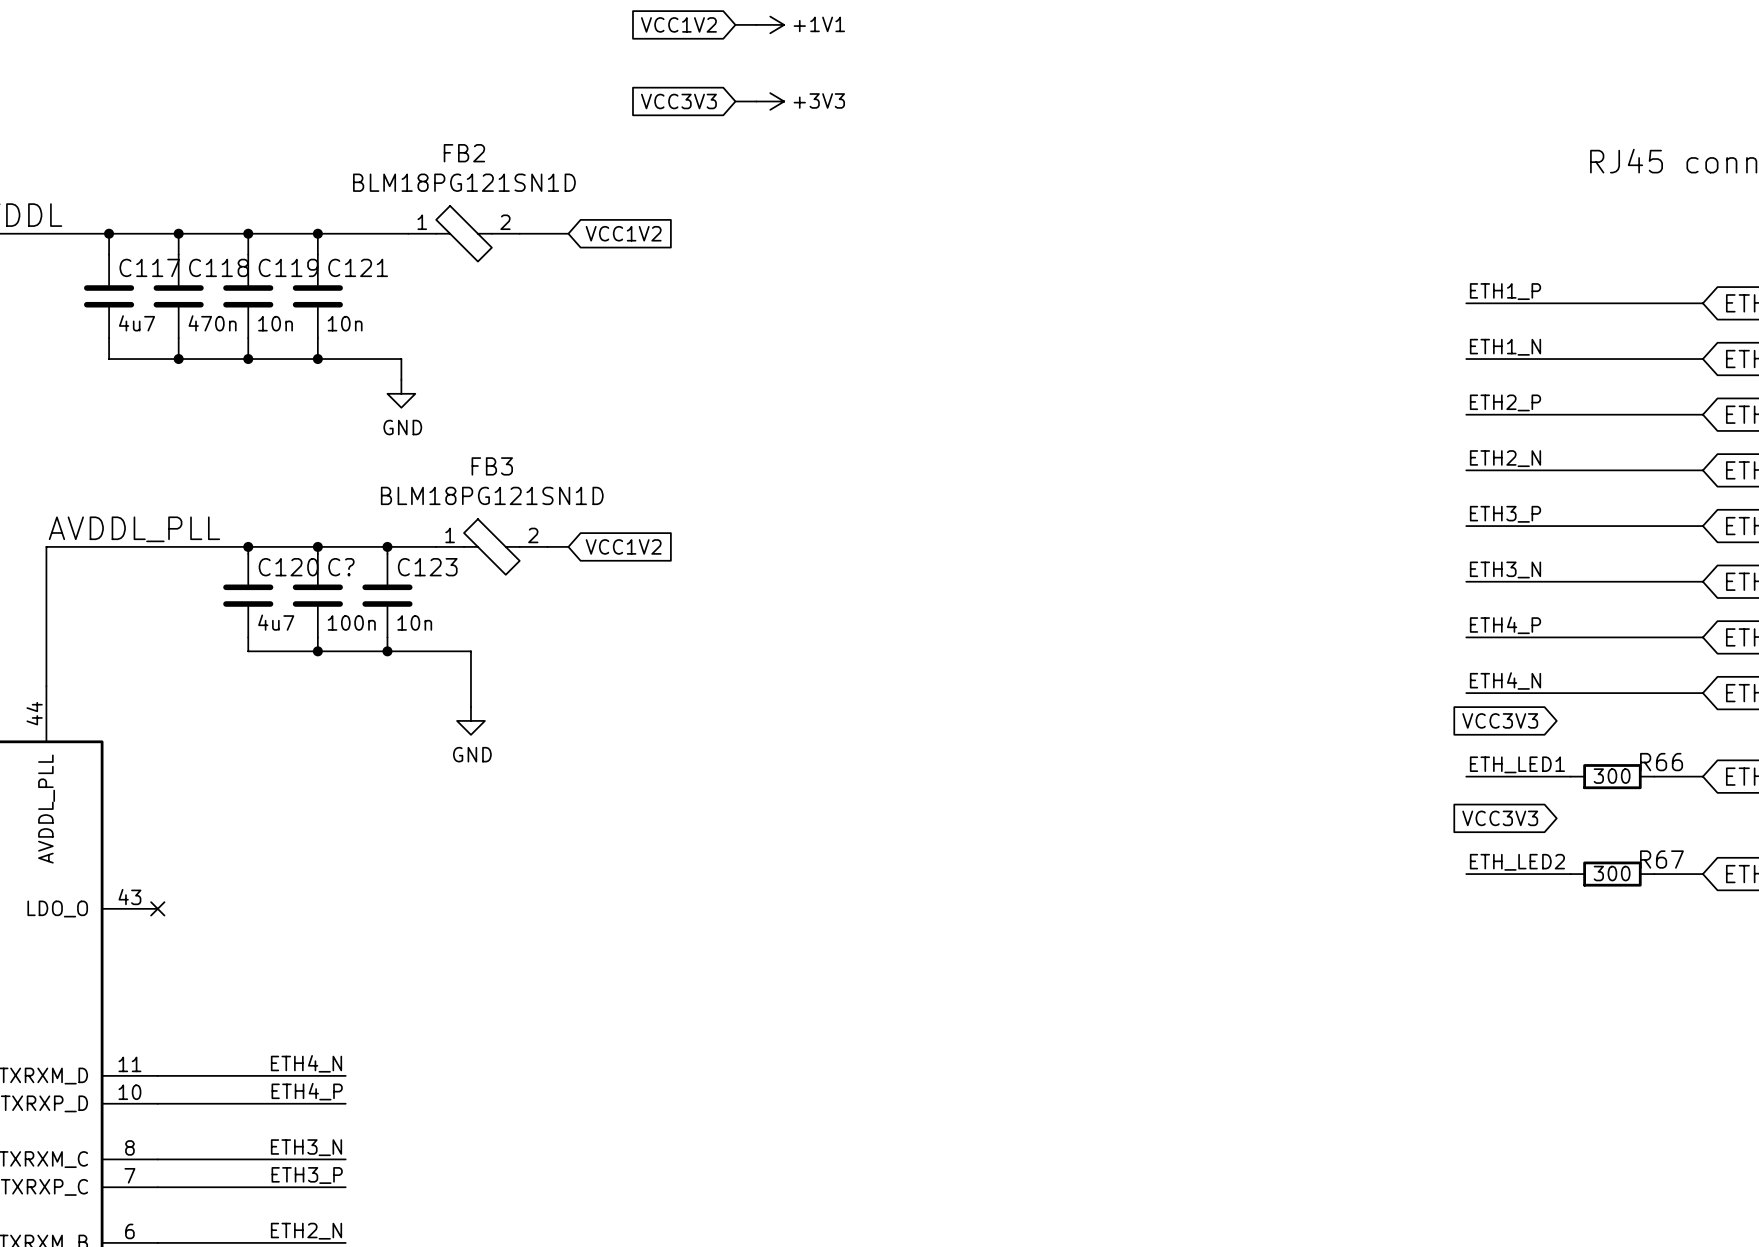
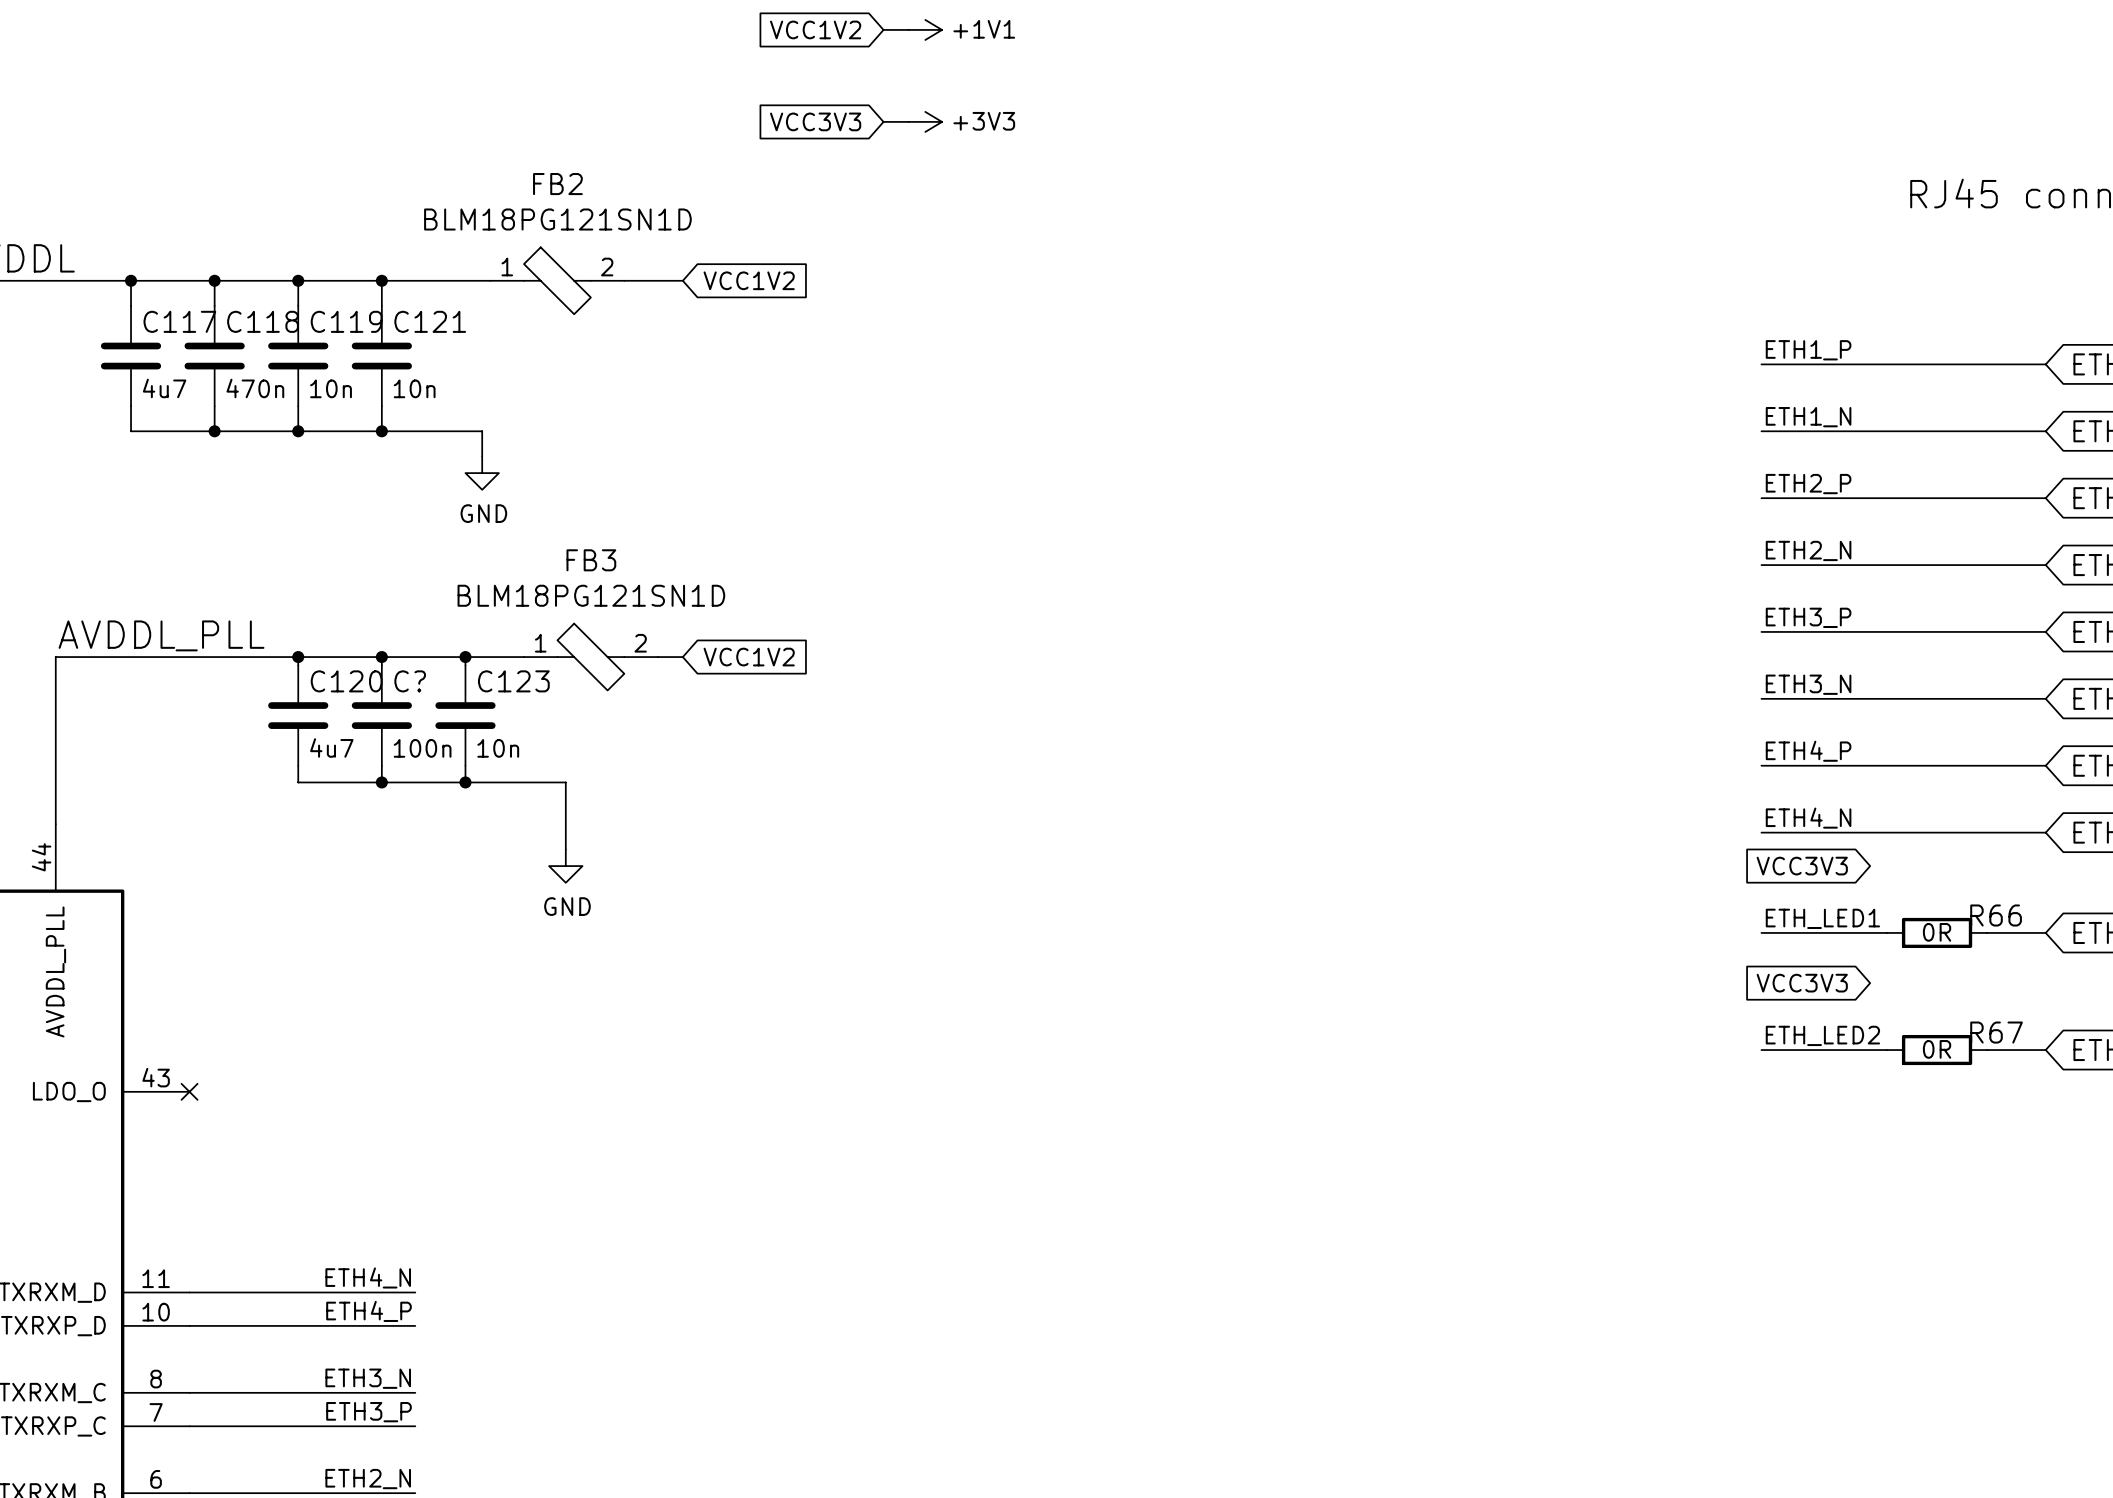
R66 text: 300 (1612, 776) -> 0R (1937, 932)
R67 text: 300 (1612, 873) -> 0R (1937, 1049)

